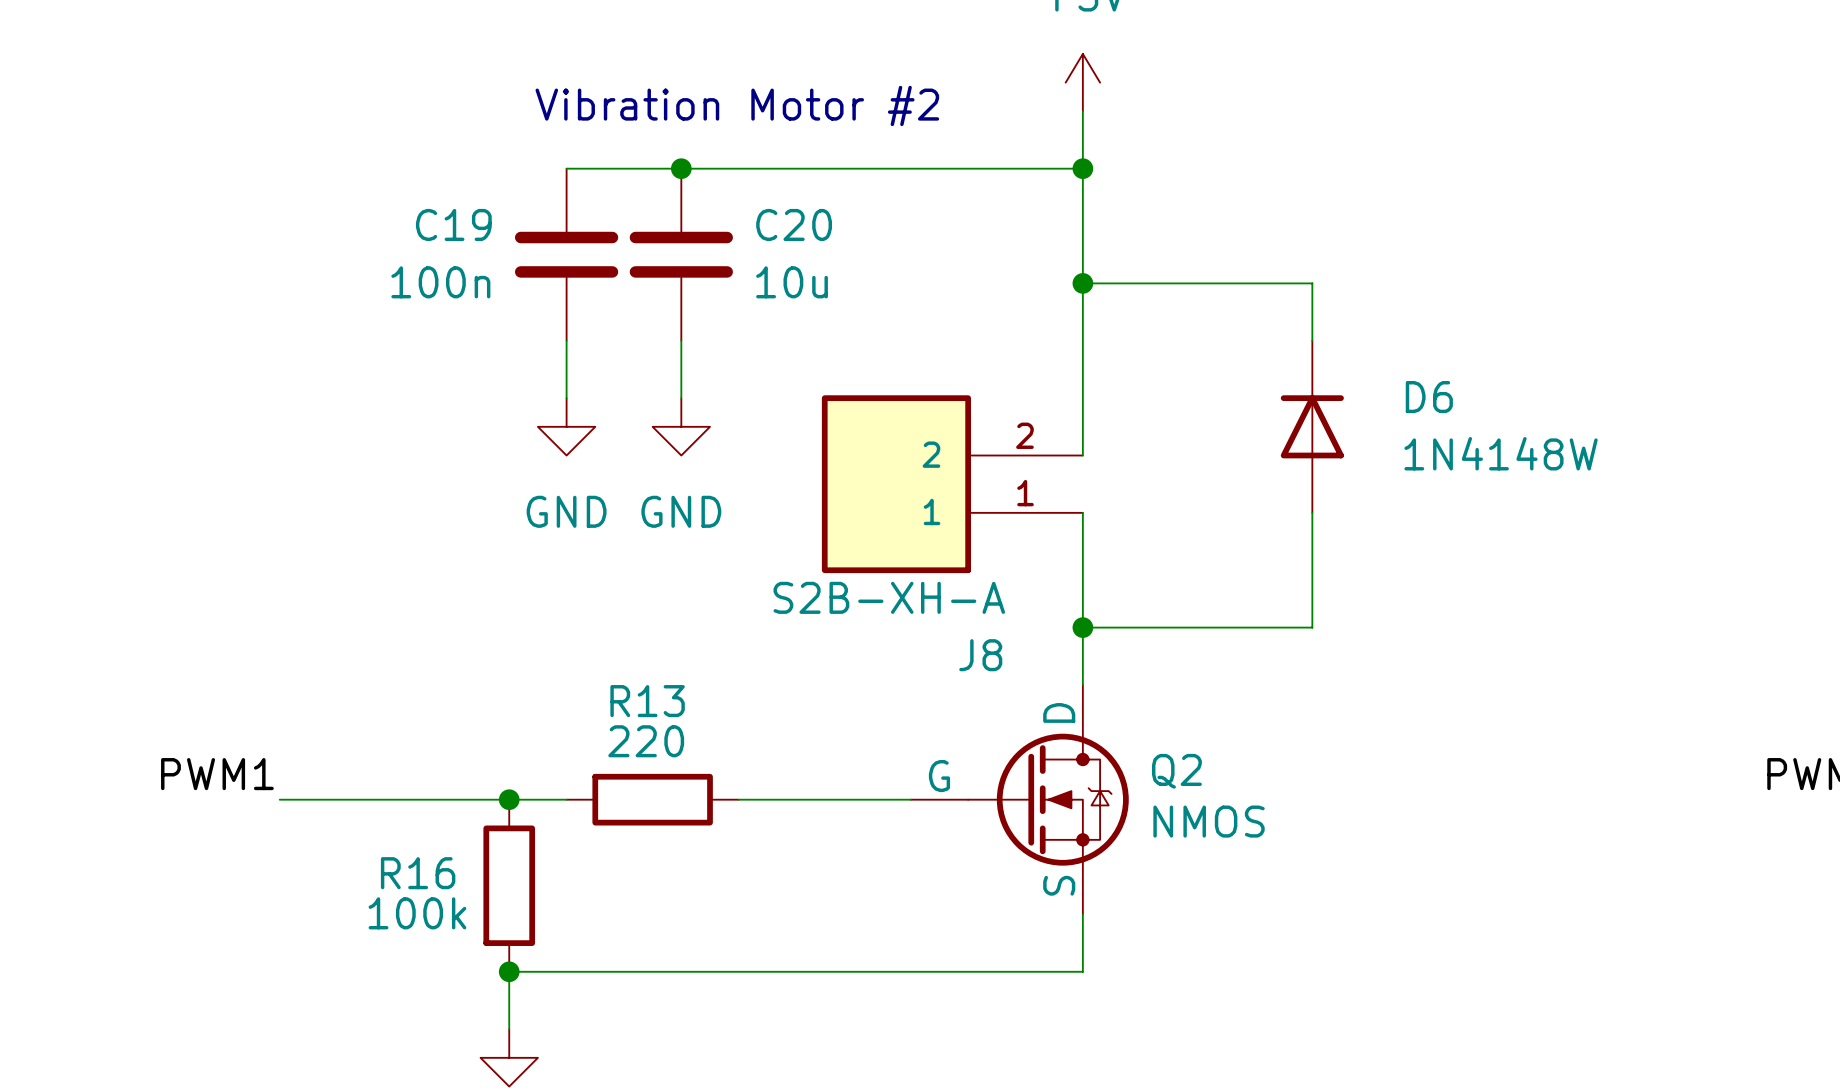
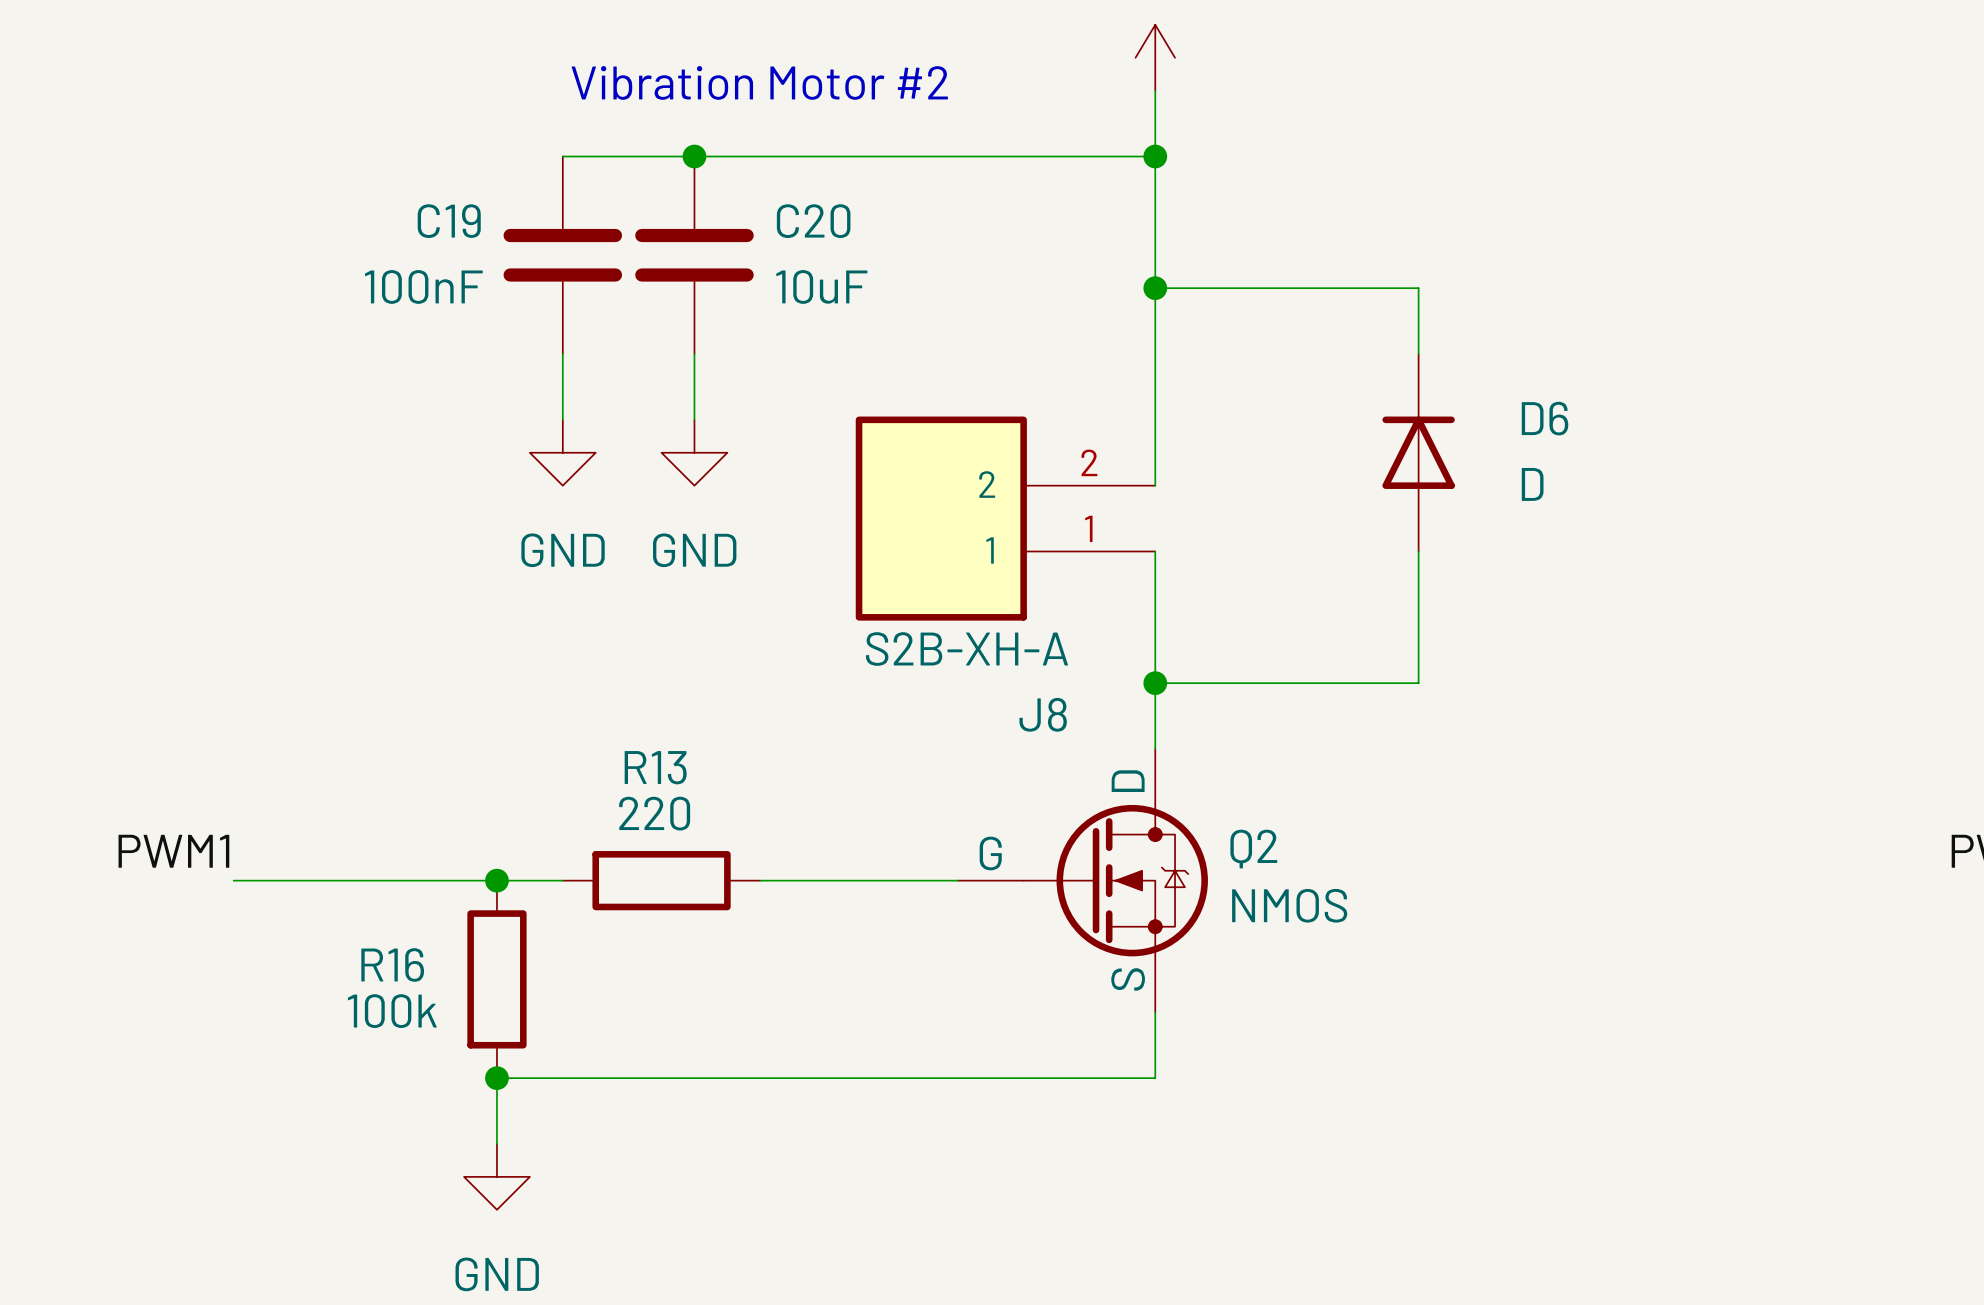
C19 value: 100n (440, 282) -> 100nF (423, 286)
C20 value: 10u (792, 282) -> 10uF (821, 286)
D6 value: 1N4148W (1501, 453) -> D (1532, 484)

